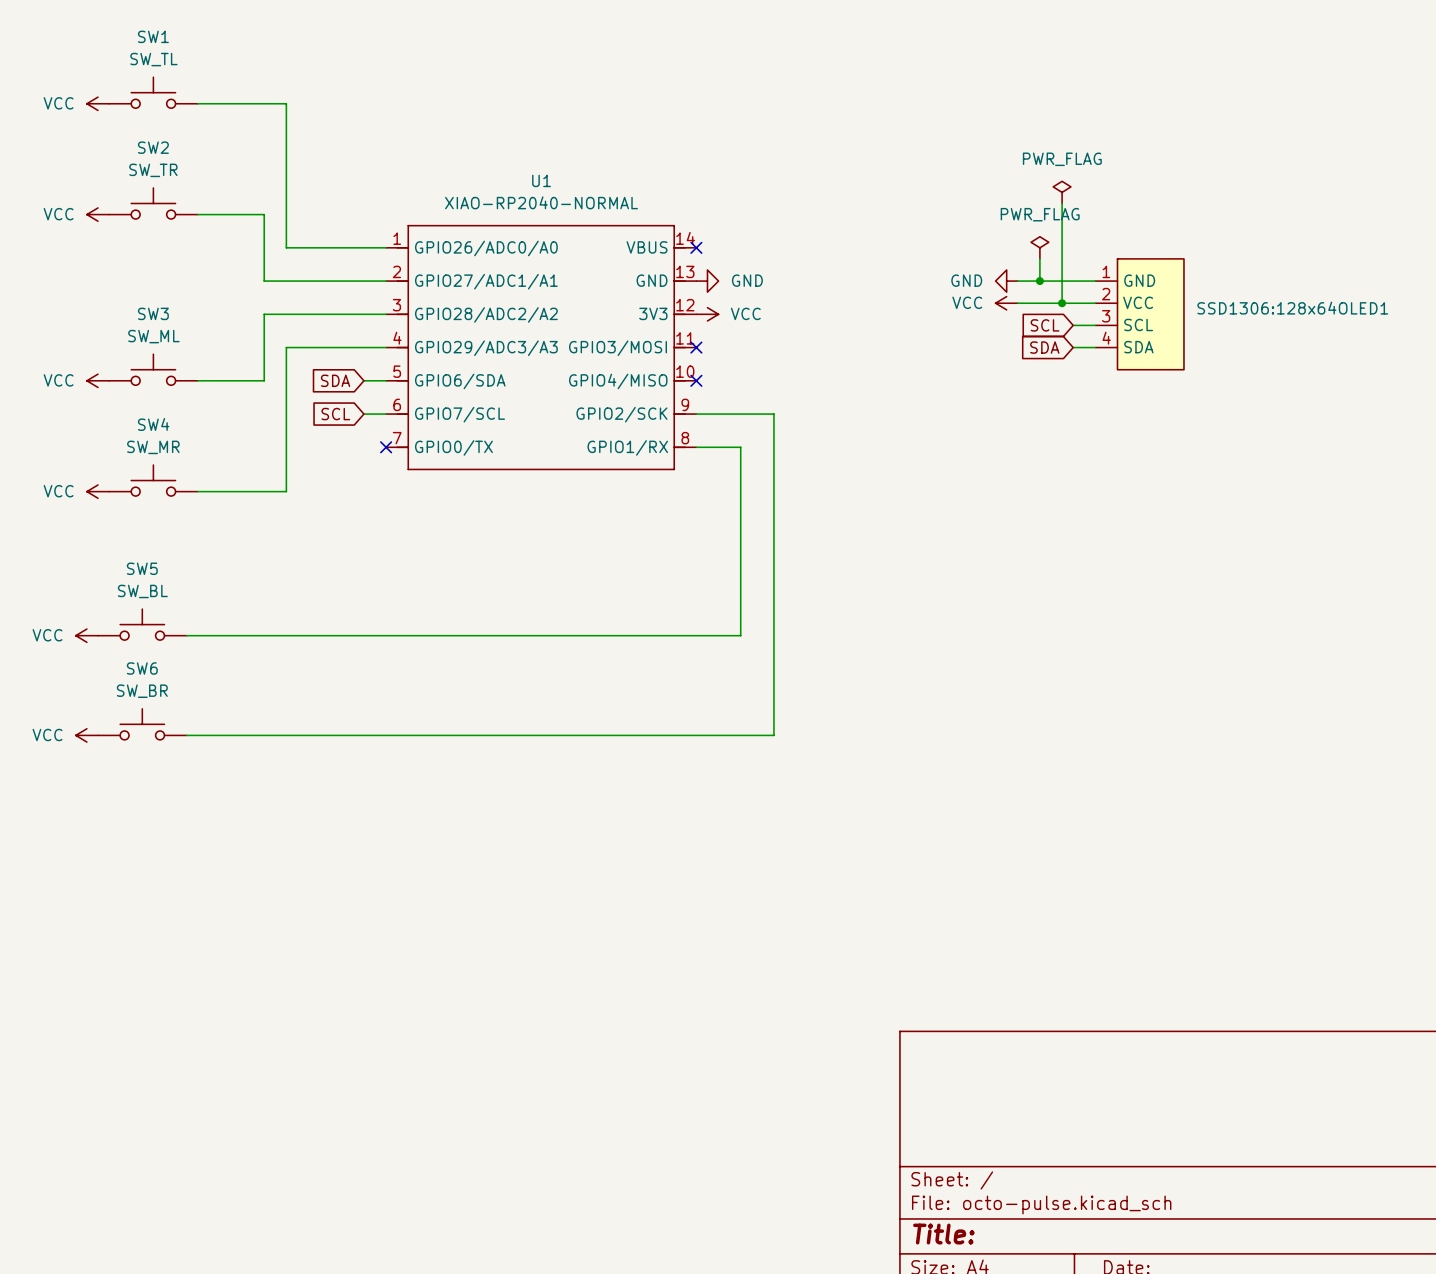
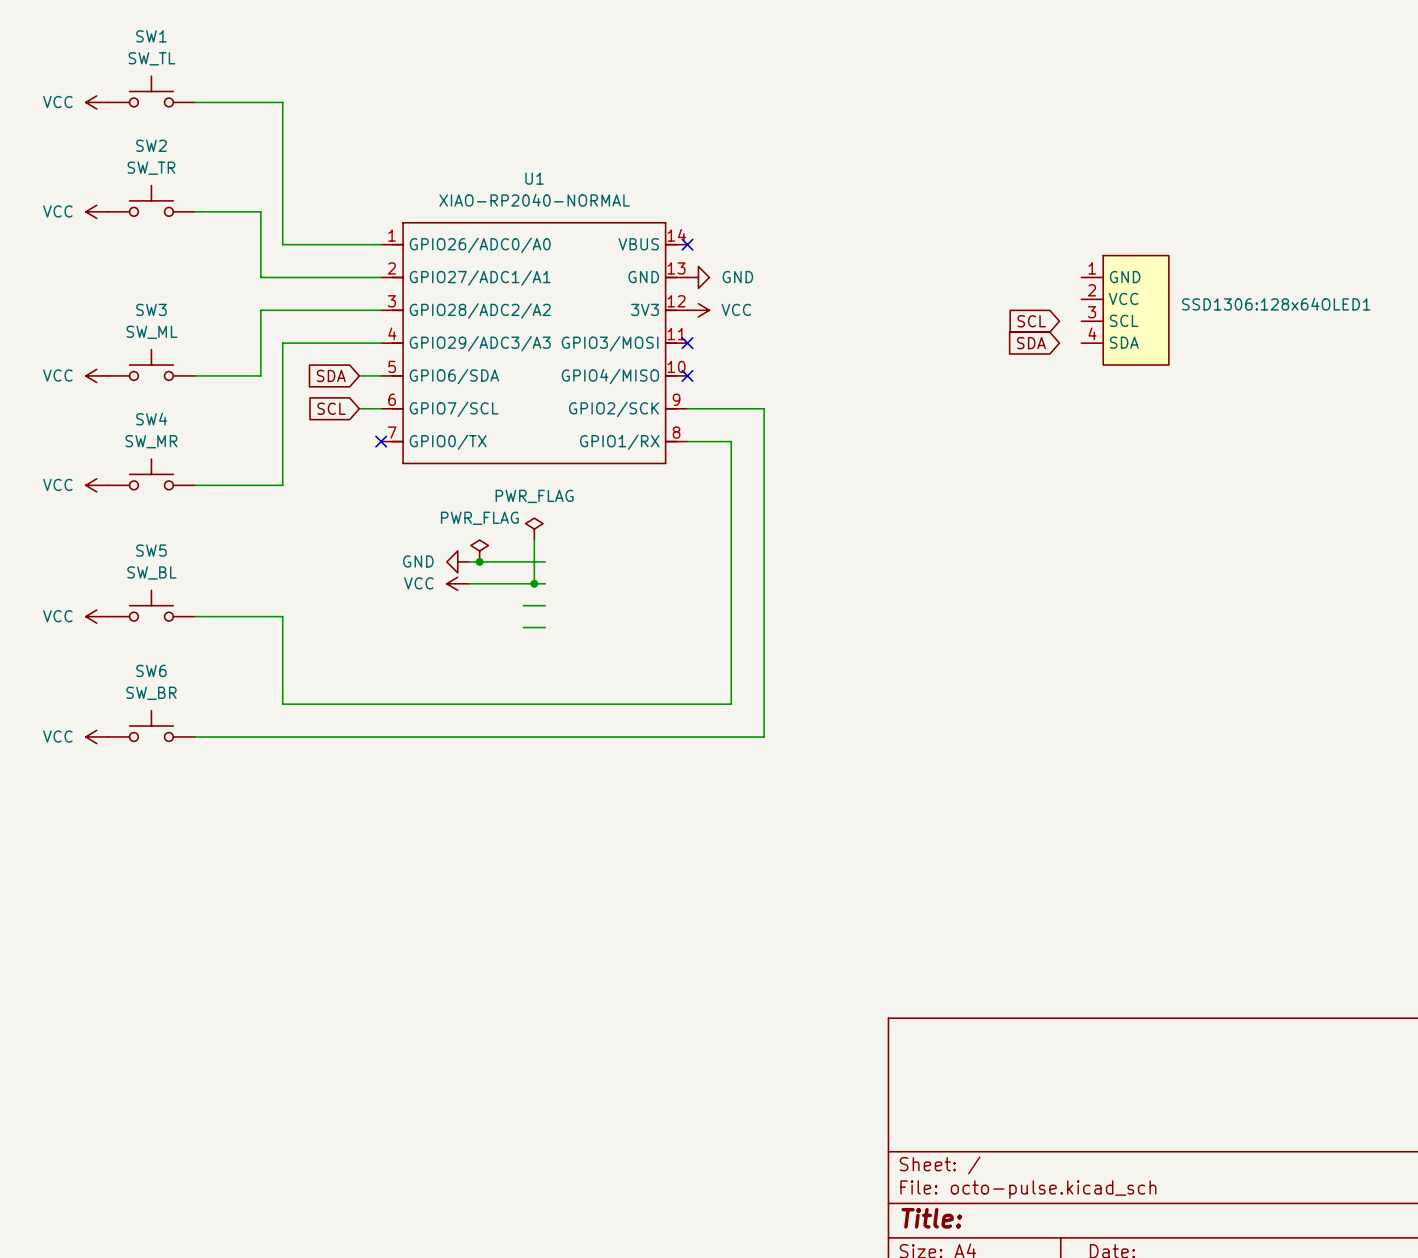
power symbol: PWR_FLAG (1062, 192) -> none
wire: (1062, 203) (1062, 303) -> none
power symbol: PWR_FLAG (1039, 247) -> none
wire: (1039, 258) (1039, 281) -> none
power symbol: GND (1006, 281) -> none
wire: (1017, 281) (1095, 281) -> none
junction: (1039, 281) -> none
power symbol: VCC (1006, 303) -> none
wire: (1017, 303) (1095, 303) -> none
junction: (1062, 303) -> none
wire: (1073, 325) (1095, 325) -> none
wire: (1073, 347) (1095, 347) -> none
power symbol: none -> PWR_FLAG (534, 529)
wire: none -> (534, 540) (534, 583)
power symbol: none -> PWR_FLAG (479, 550)
power symbol: none -> GND (457, 561)
wire: none -> (468, 561) (545, 561)
junction: none -> (479, 561)
power symbol: none -> VCC (457, 583)
wire: none -> (468, 583) (545, 583)
junction: none -> (534, 583)
wire: none -> (523, 605) (545, 605)
SW5 position: (142, 624) -> (151, 605)
power symbol position: VCC (86, 635) -> VCC (96, 616)
wire: (186, 635) (530, 635) -> none
wire: (552, 635) (740, 635) -> (195, 616) (282, 616) (282, 704) (731, 704) (731, 627)
SW6 position: (142, 724) -> (151, 726)
power symbol position: VCC (86, 735) -> VCC (96, 736)
wire: (186, 735) (773, 735) -> (195, 736) (764, 736) (764, 726)

